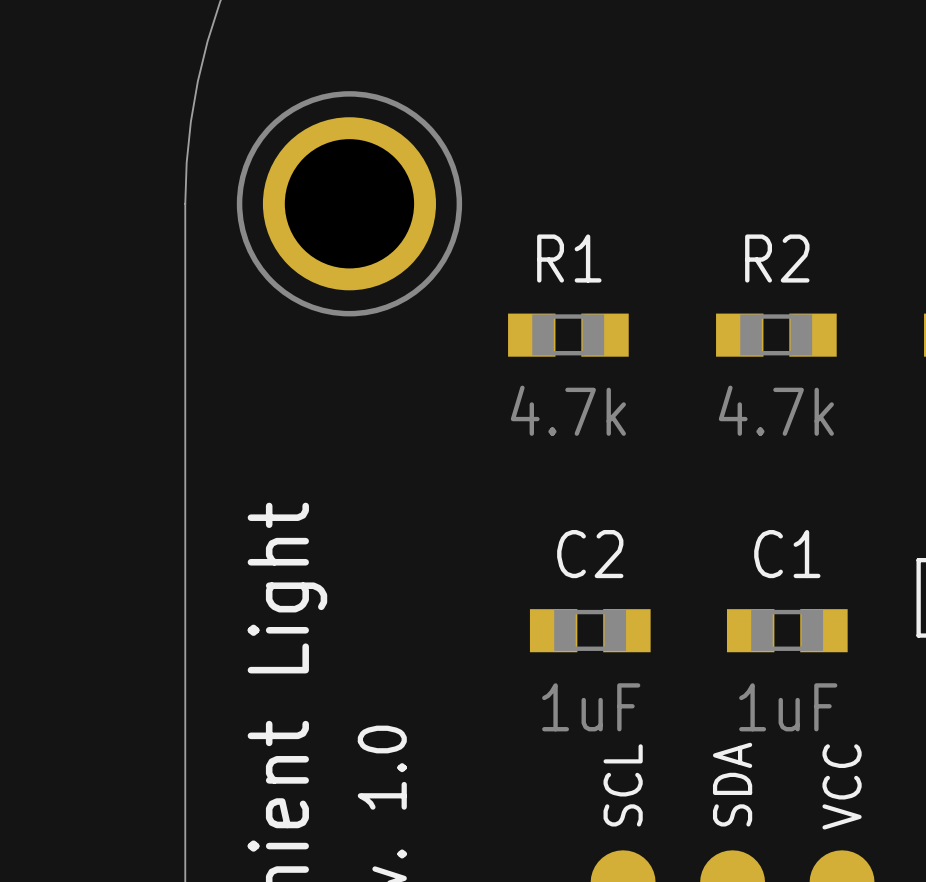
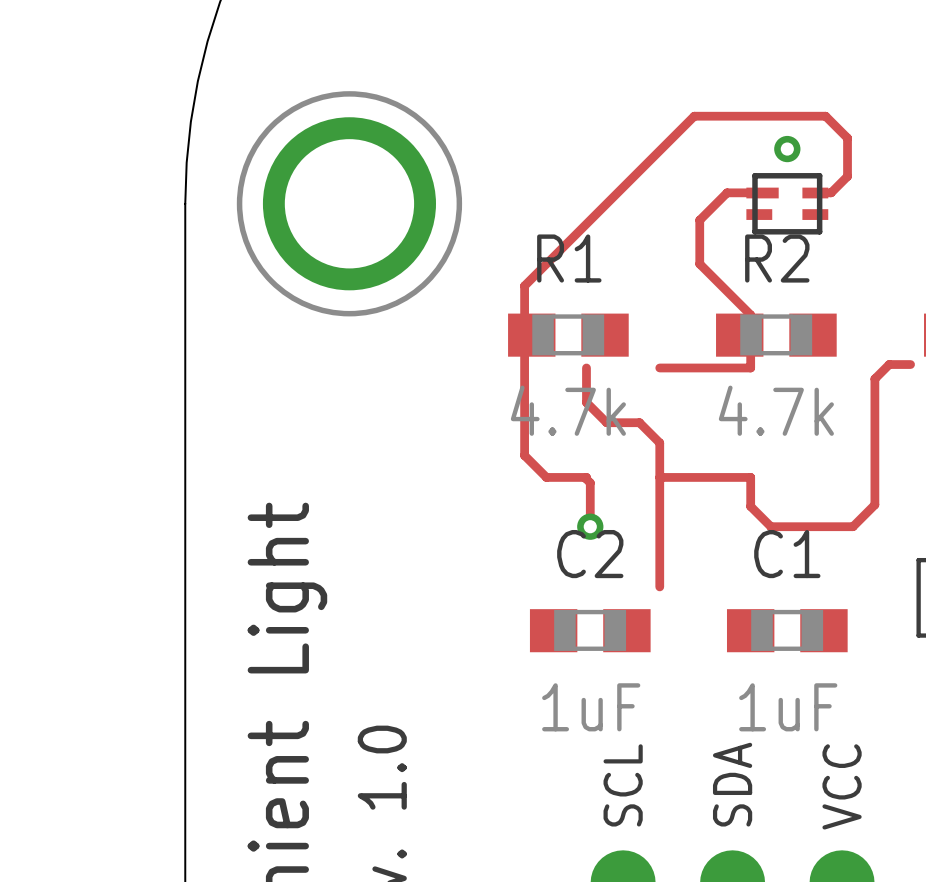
via: none -> (787, 149)
track: none -> (762, 192) (727, 192) (699, 220) (699, 263) (750, 314) (750, 367) (659, 367)
track: none -> (815, 192) (831, 192) (847, 176) (847, 138) (825, 116) (694, 116) (524, 285) (524, 455) (546, 477) (586, 477) (590, 482) (590, 526)
part: none -> (787, 203)
track: none -> (910, 364) (889, 364) (874, 378) (874, 504) (852, 526) (770, 526) (750, 506) (750, 477) (659, 477)
track: none -> (586, 367) (586, 402) (606, 422) (639, 422) (659, 442) (659, 586)
via: none -> (590, 526)

